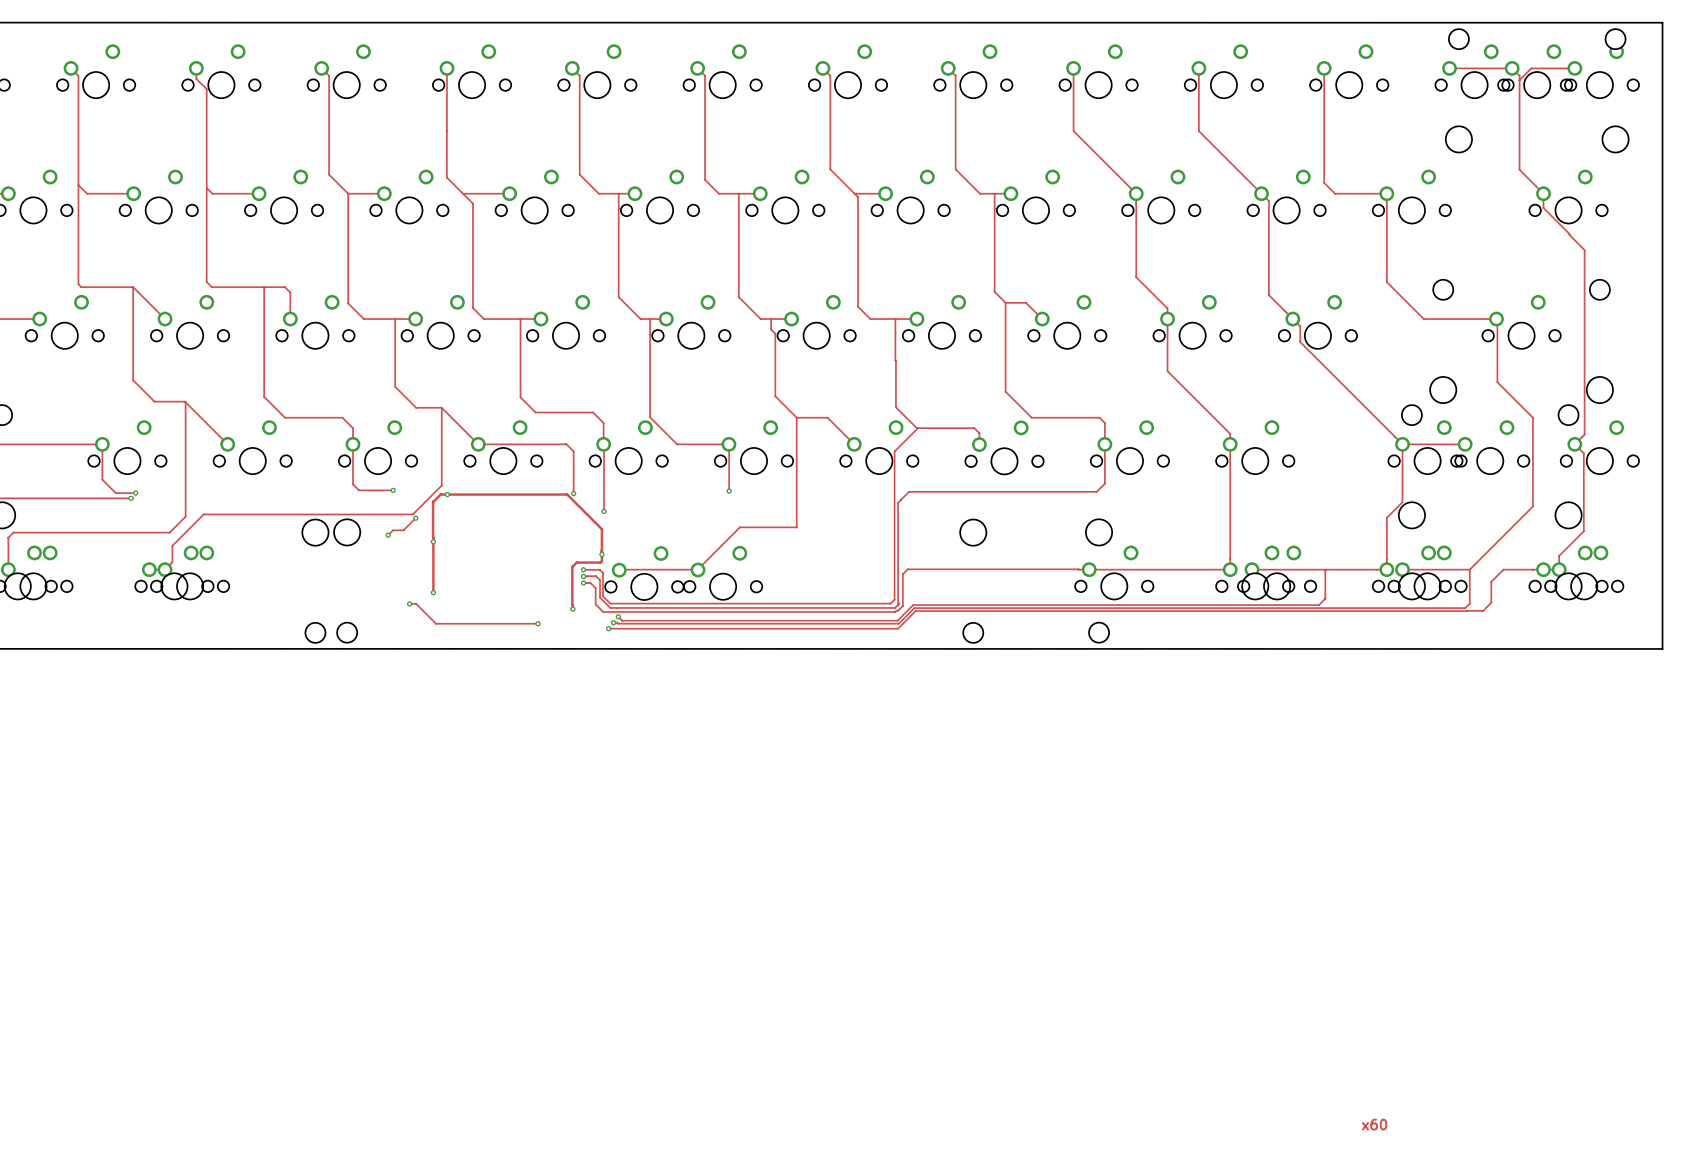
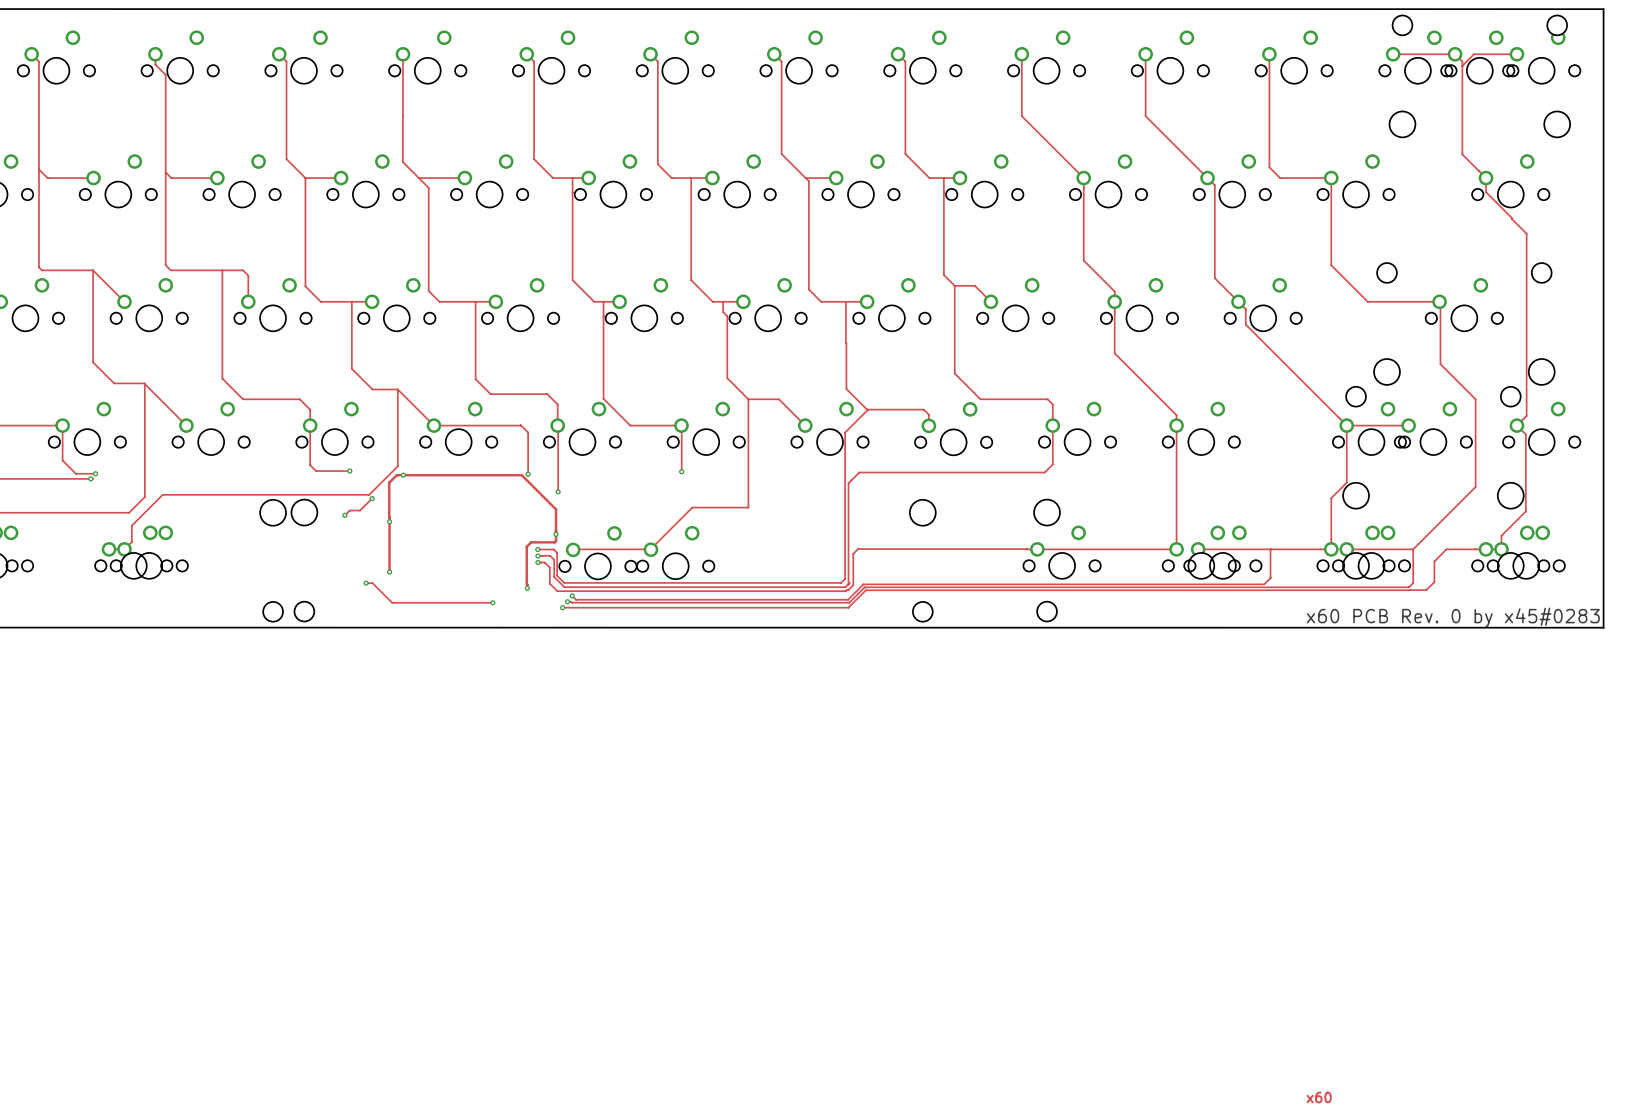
text: none -> x60 PCB Rev. 0 by x45#0283 (1453, 617)

